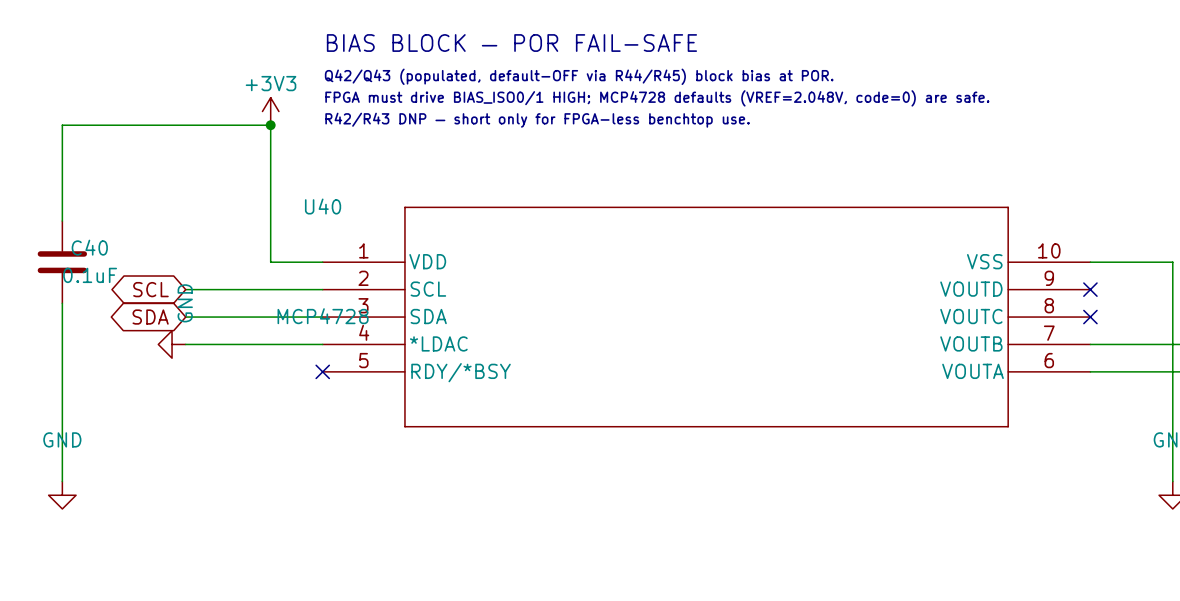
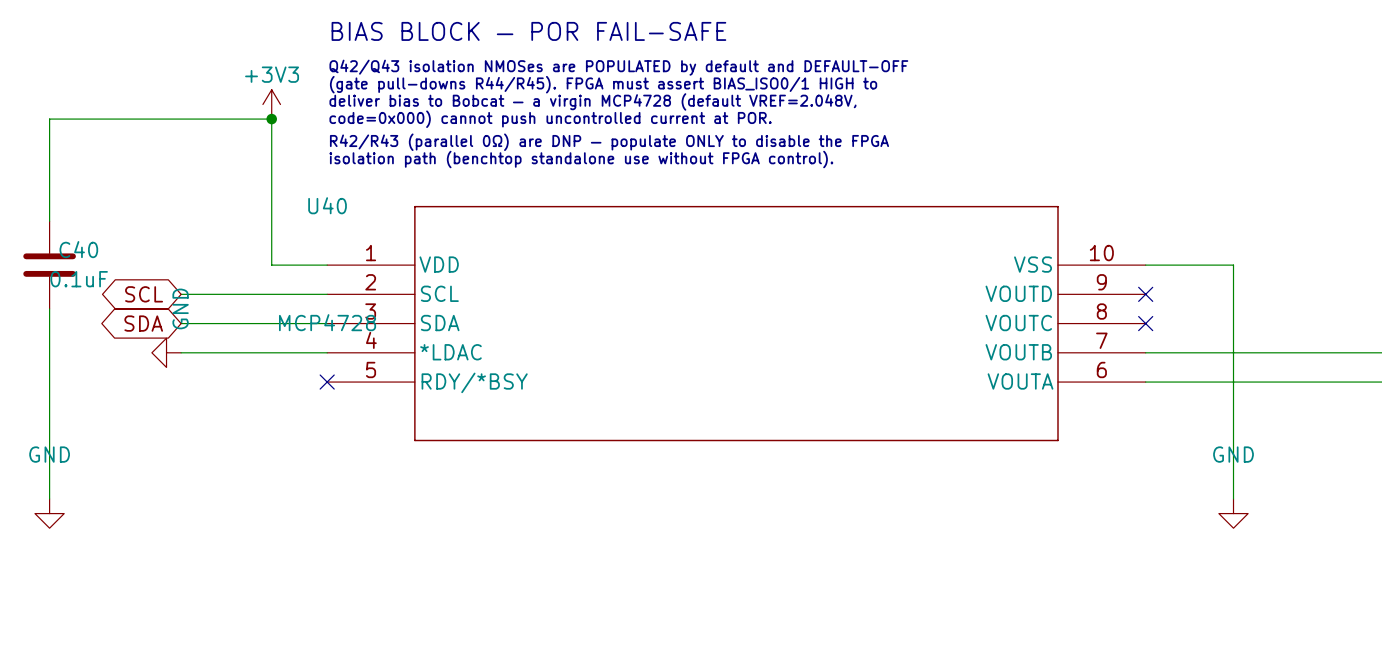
text: Q42/Q43 (populated, default-OFF via R44/R45) block bias at POR. (579, 76) -> Q42/Q43 isolation NMOSes are POPULATED by default and DEFAULT-OFF (618, 67)
text: none -> (gate pull-downs R44/R45). FPGA must assert BIAS_ISO0/1 HIGH to (603, 84)
text: FPGA must drive BIAS_ISO0/1 HIGH; MCP4728 defaults (VREF=2.048V, code=0) are safe. (657, 98) -> none
text: none -> deliver bias to Bobcat — a virgin MCP4728 (default VREF=2.048V, (592, 101)
text: R42/R43 DNP — short only for FPGA-less benchtop use. (537, 120) -> none
text: none -> code=0x000) cannot push uncontrolled current at POR. (550, 119)
text: none -> R42/R43 (parallel 0Ω) are DNP — populate ONLY to disable the FPGA (609, 142)
text: none -> isolation path (benchtop standalone use without FPGA control). (581, 159)

